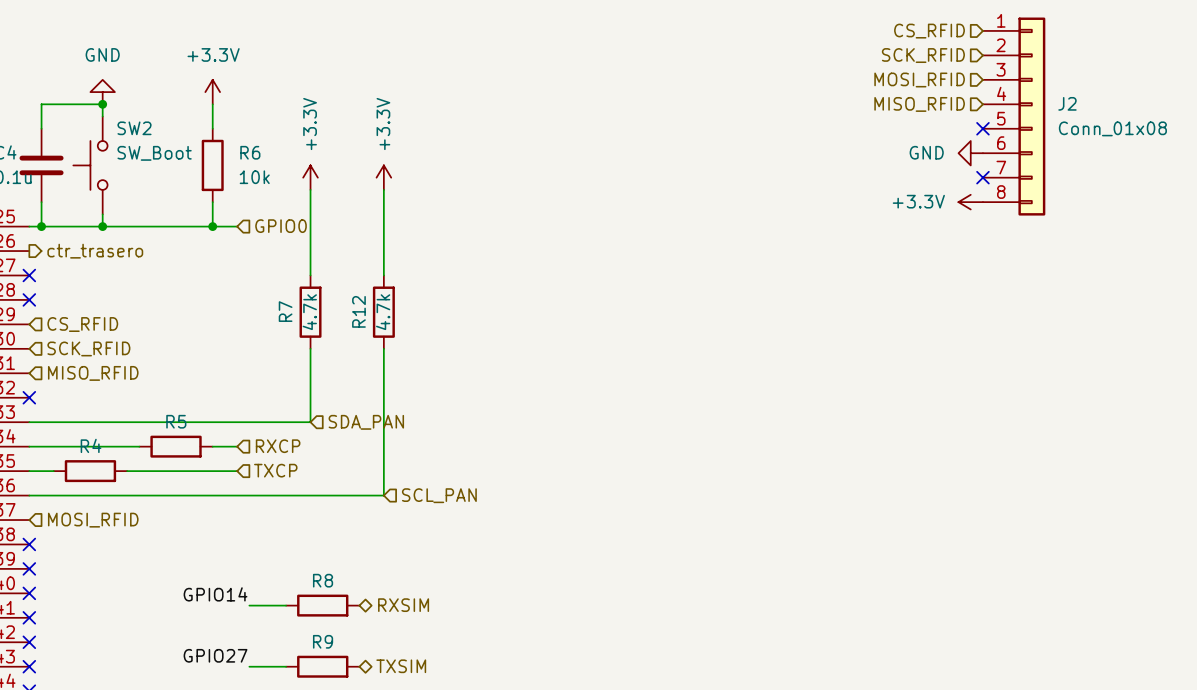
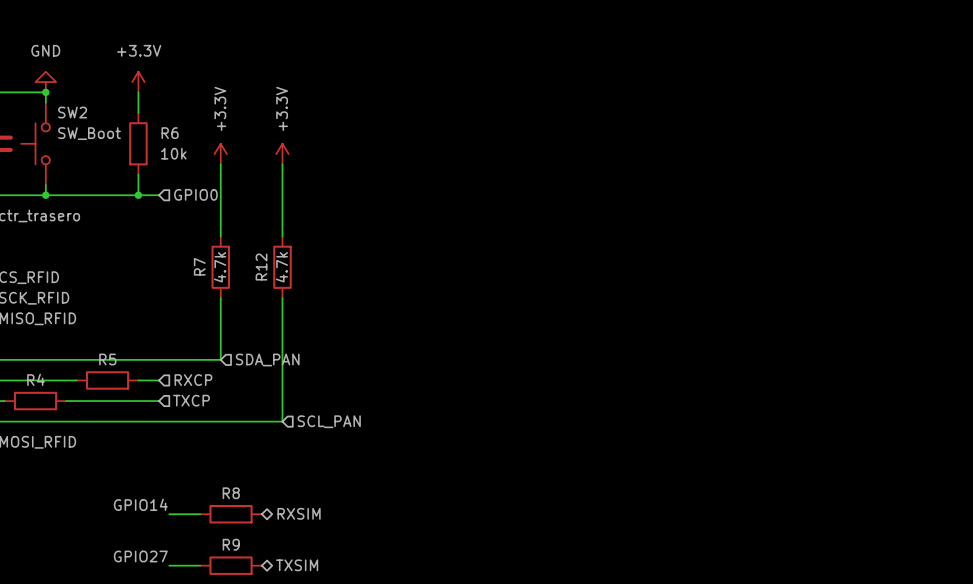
hierarchical label: CS_RFID (929, 31) -> none
hierarchical label: SCK_RFID (923, 55) -> none
hierarchical label: MOSI_RFID (919, 79) -> none
hierarchical label: MISO_RFID (919, 104) -> none
J2: Conn_01x08 (1014, 116) -> none
no-connect mark: (982, 128) -> none
power symbol: GND (970, 153) -> none
no-connect mark: (982, 177) -> none
power symbol: +3.3V (970, 202) -> none

